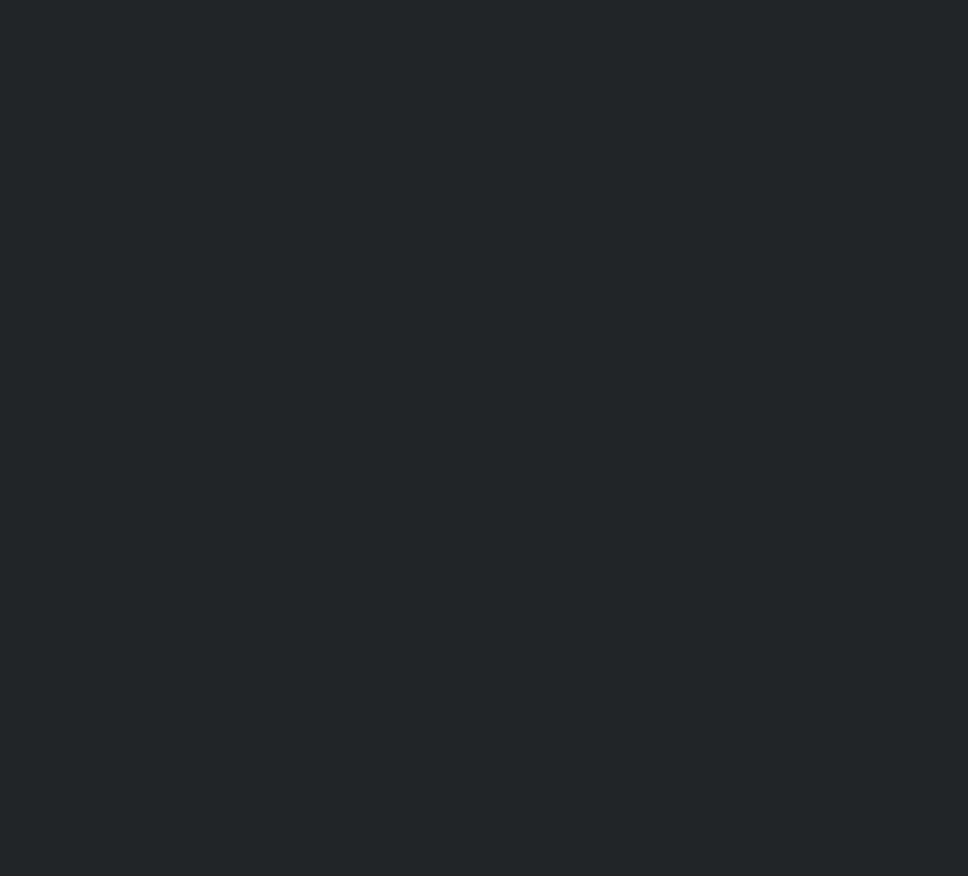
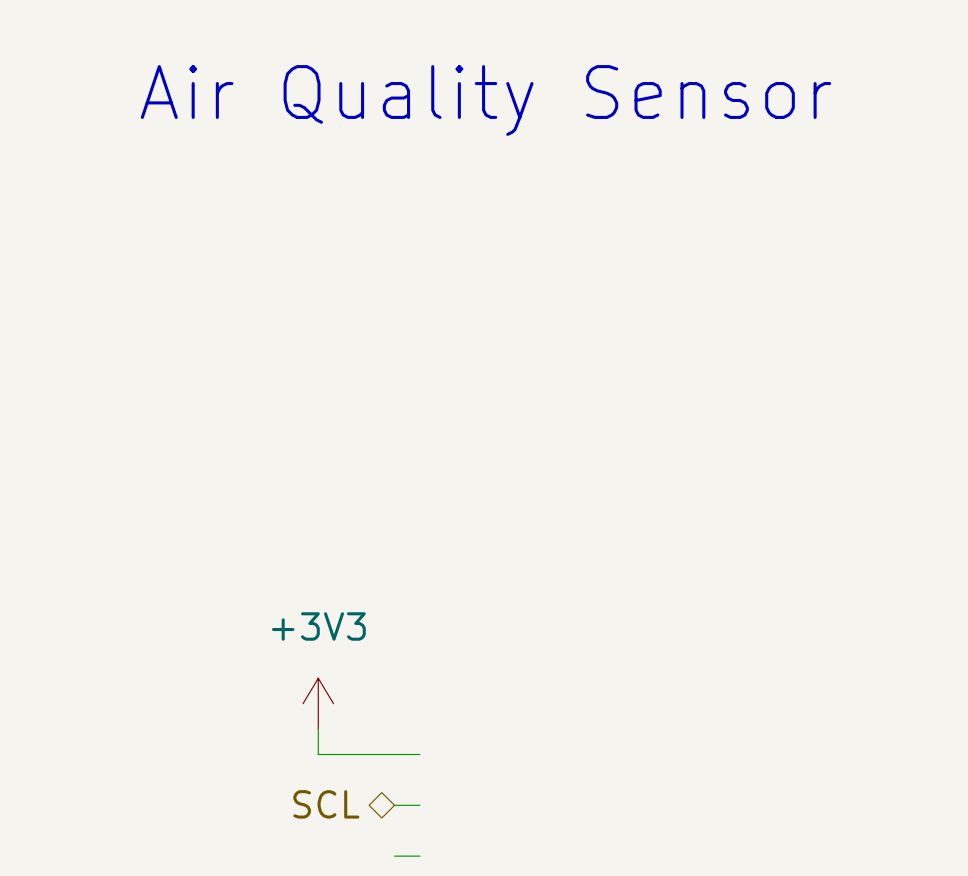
text: none -> Air Quality Sensor (485, 100)
power symbol: none -> +3V3 (318, 703)
wire: none -> (318, 729) (318, 754) (419, 754)
hierarchical label: none -> SCL (326, 804)
wire: none -> (394, 805) (419, 805)
wire: none -> (394, 856) (419, 856)

